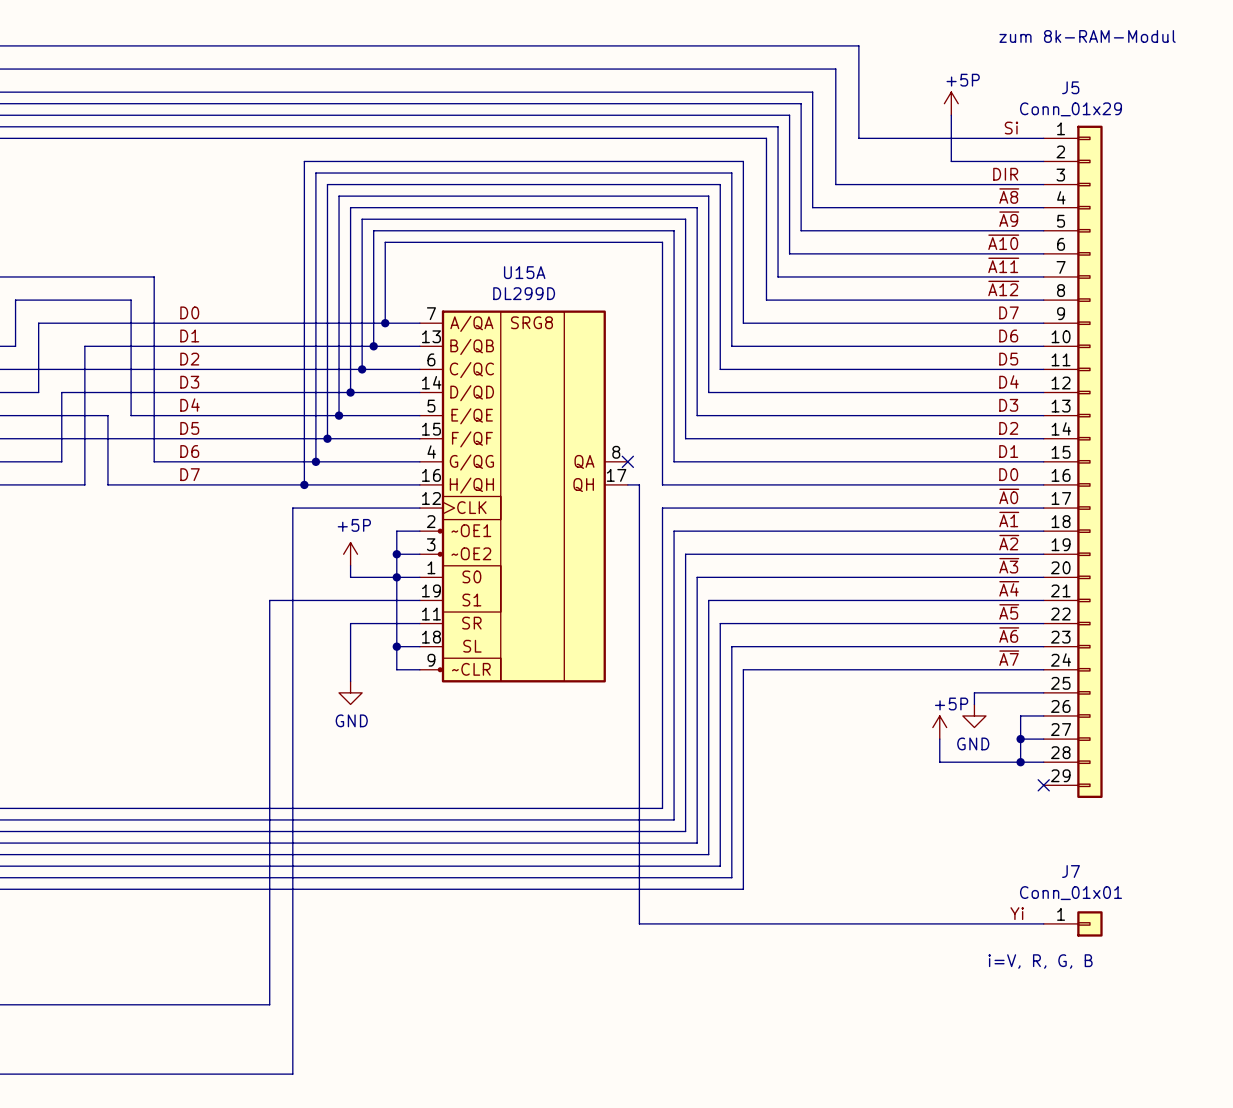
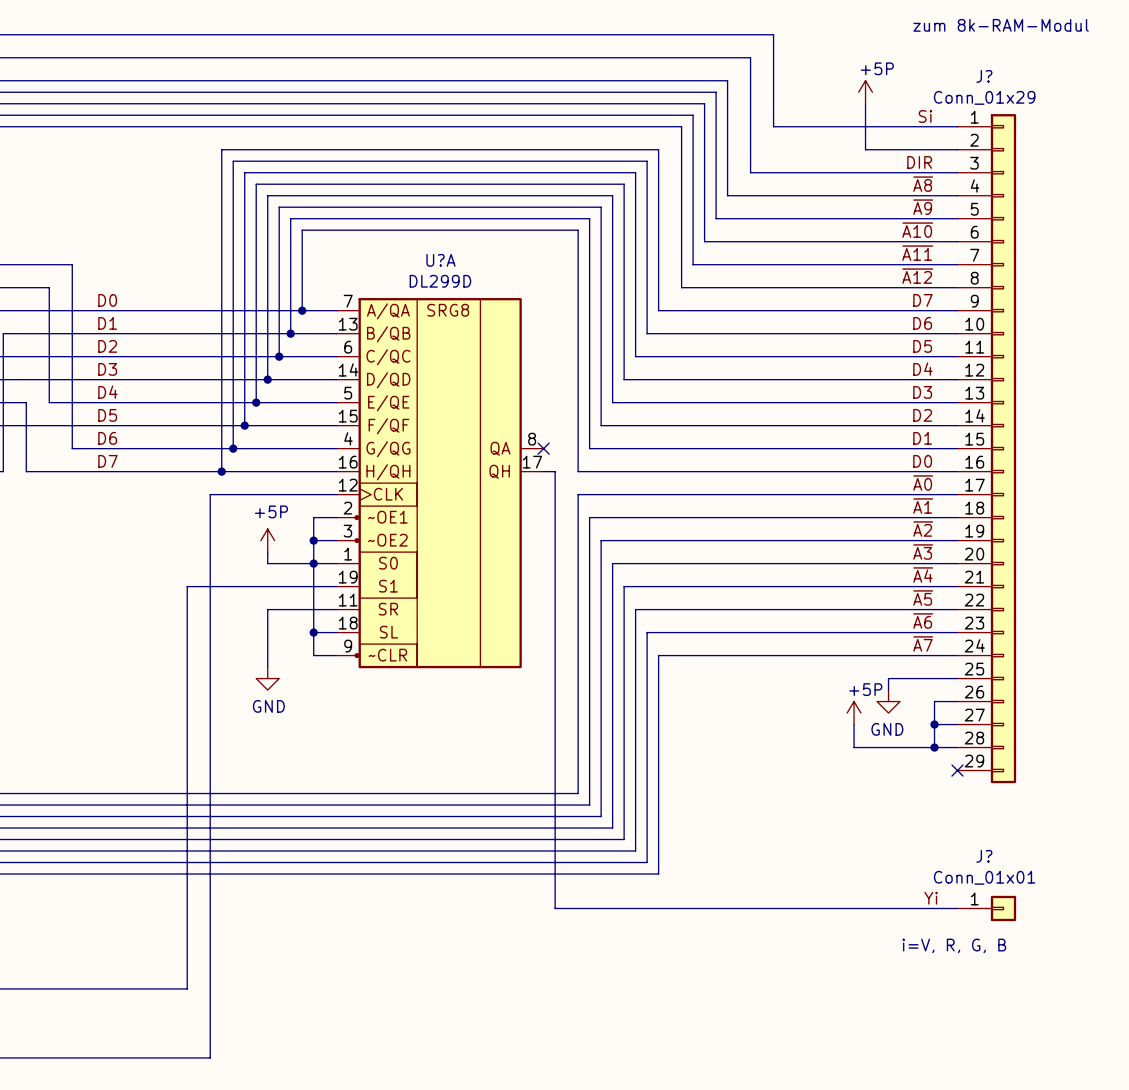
J5 name: J5 (1070, 87) -> J? (984, 76)
U15A name: U15A (524, 272) -> U?A (440, 260)
J7 name: J7 (1071, 871) -> J? (984, 856)

